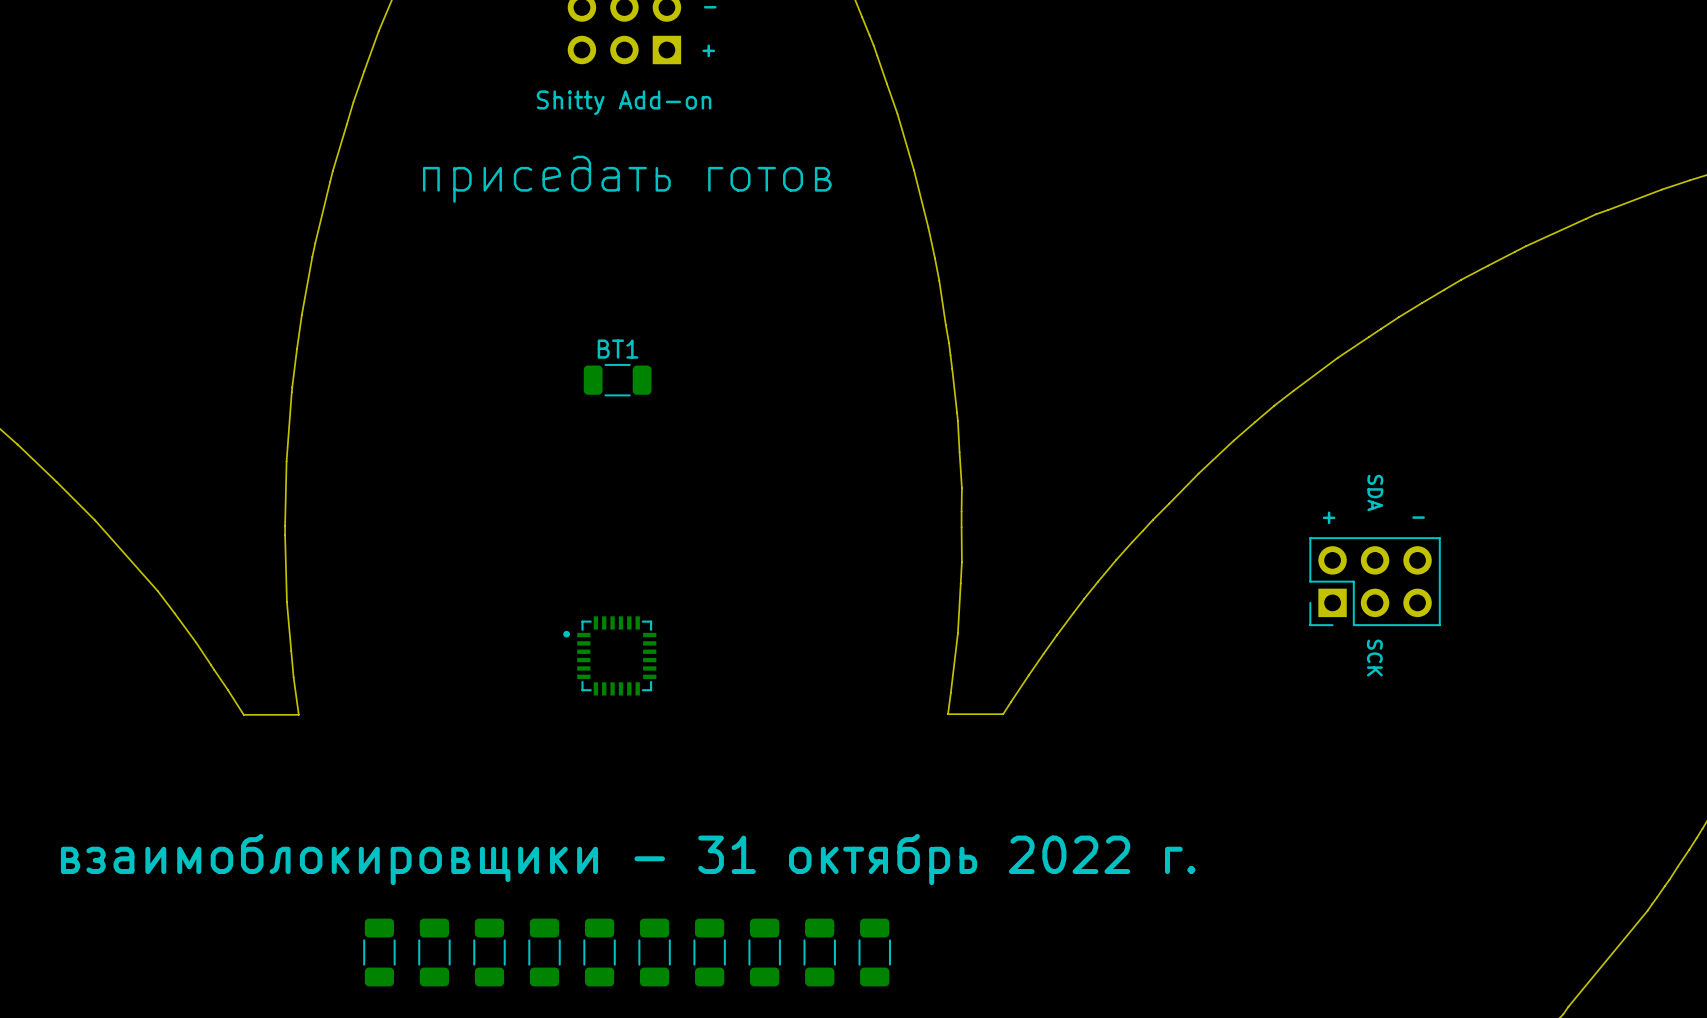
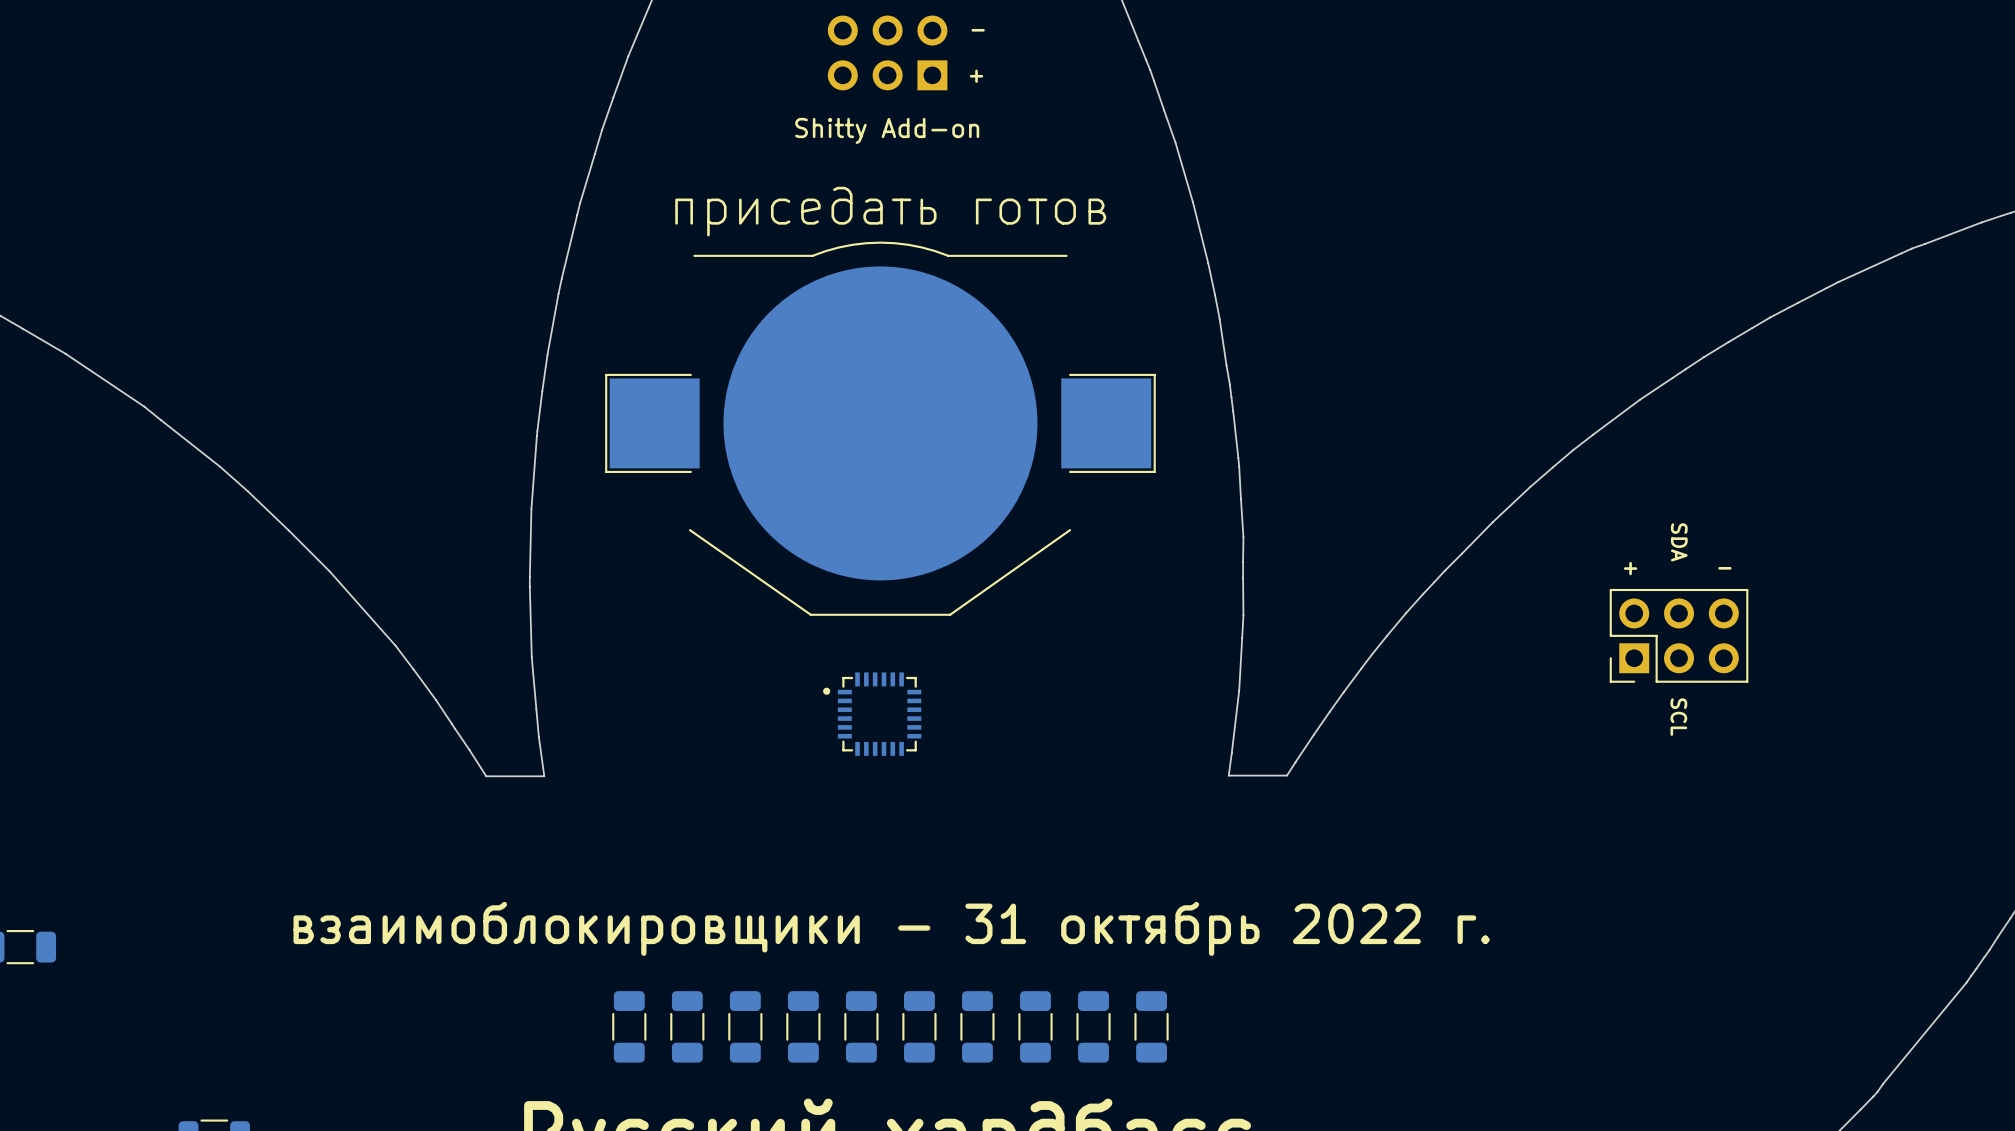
BT1: (617, 380) -> none
part: none -> (880, 428)
text: SCK (1374, 658) -> SCL (1678, 717)

